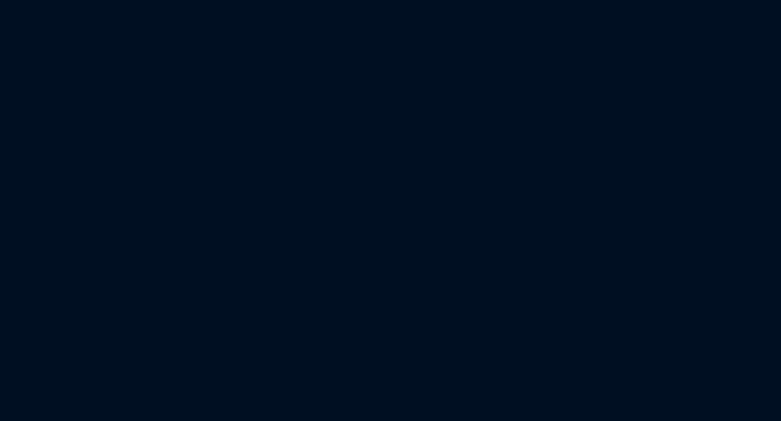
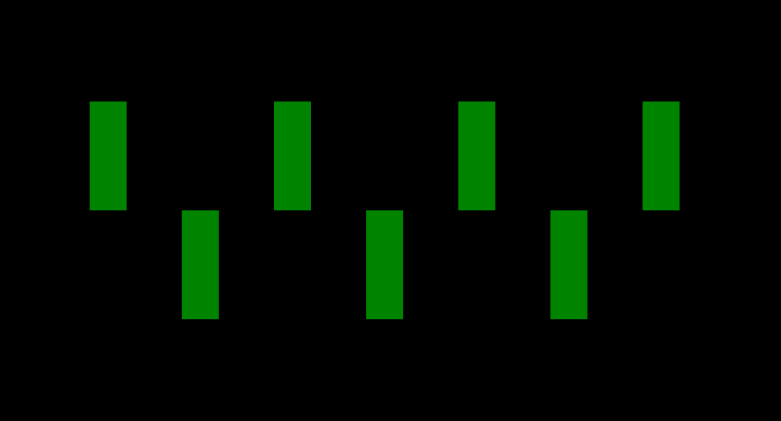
part: none -> (384, 210)

